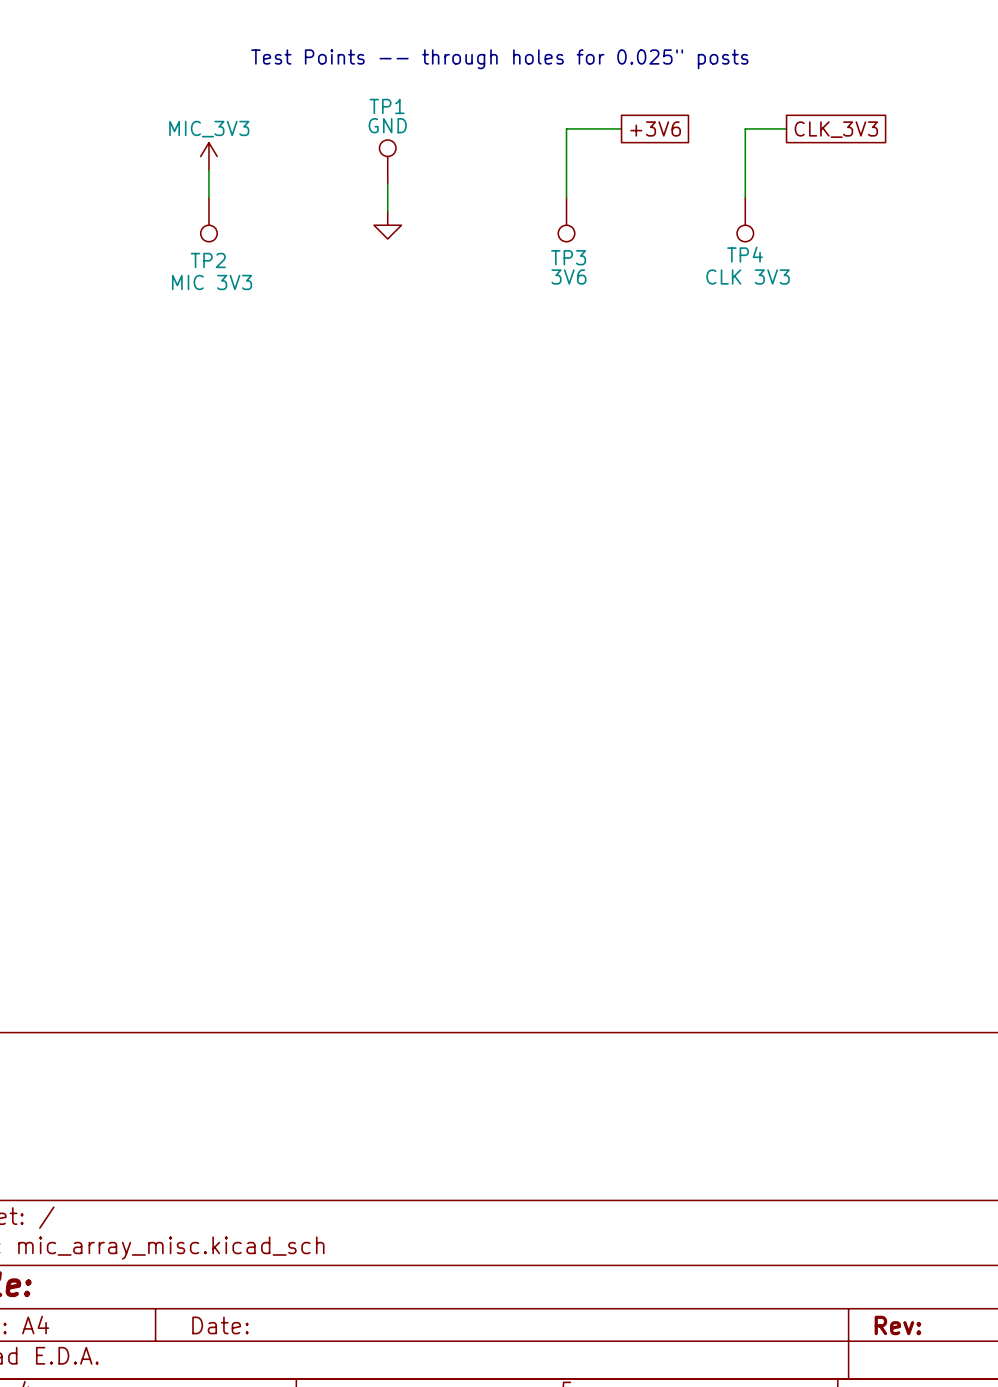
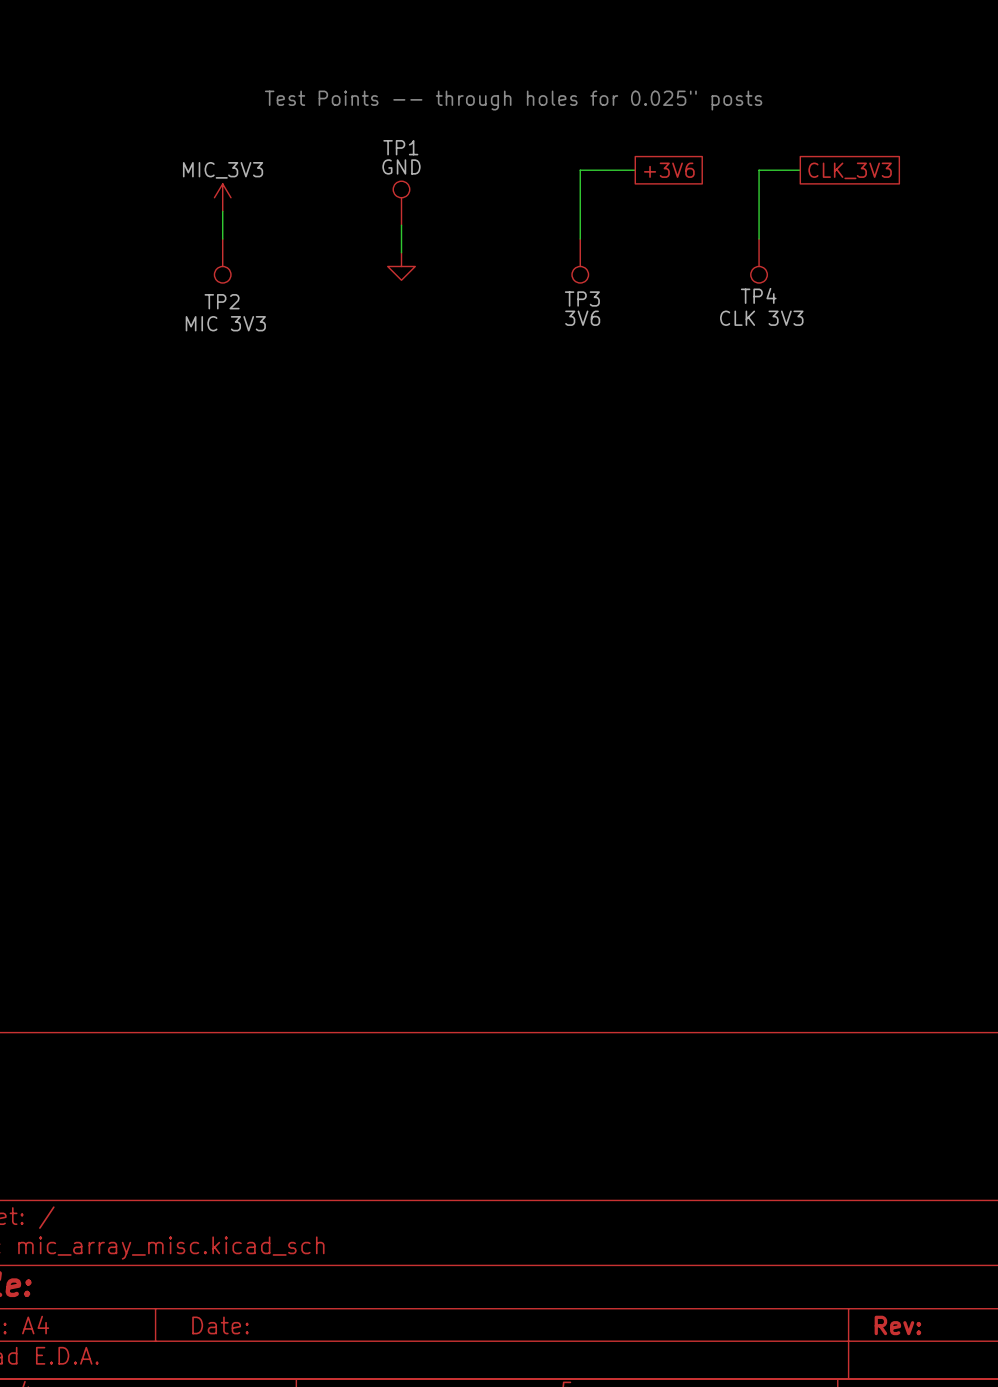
text position: Test Points -- through holes for 0.025" posts (499, 59) -> Test Points -- through holes for 0.025" posts (513, 100)
wire: (621, 128) (566, 128) (566, 197) -> (635, 170) (580, 170) (580, 238)
global label position: +3V6 (655, 128) -> +3V6 (669, 170)
wire: (786, 128) (745, 128) (745, 197) -> (800, 170) (759, 170) (759, 238)
global label position: CLK_3V3 (836, 129) -> CLK_3V3 (850, 170)
power symbol position: MIC_3V3 (208, 156) -> MIC_3V3 (222, 197)
TP1 position: (387, 161) -> (401, 203)
wire: (208, 170) (208, 197) -> (222, 211) (222, 238)
wire: (387, 183) (387, 211) -> (401, 225) (401, 252)
TP2 position: (208, 219) -> (222, 260)
TP3 position: (566, 219) -> (580, 260)
TP4 position: (745, 219) -> (759, 260)
power symbol position: (387, 225) -> (401, 266)

